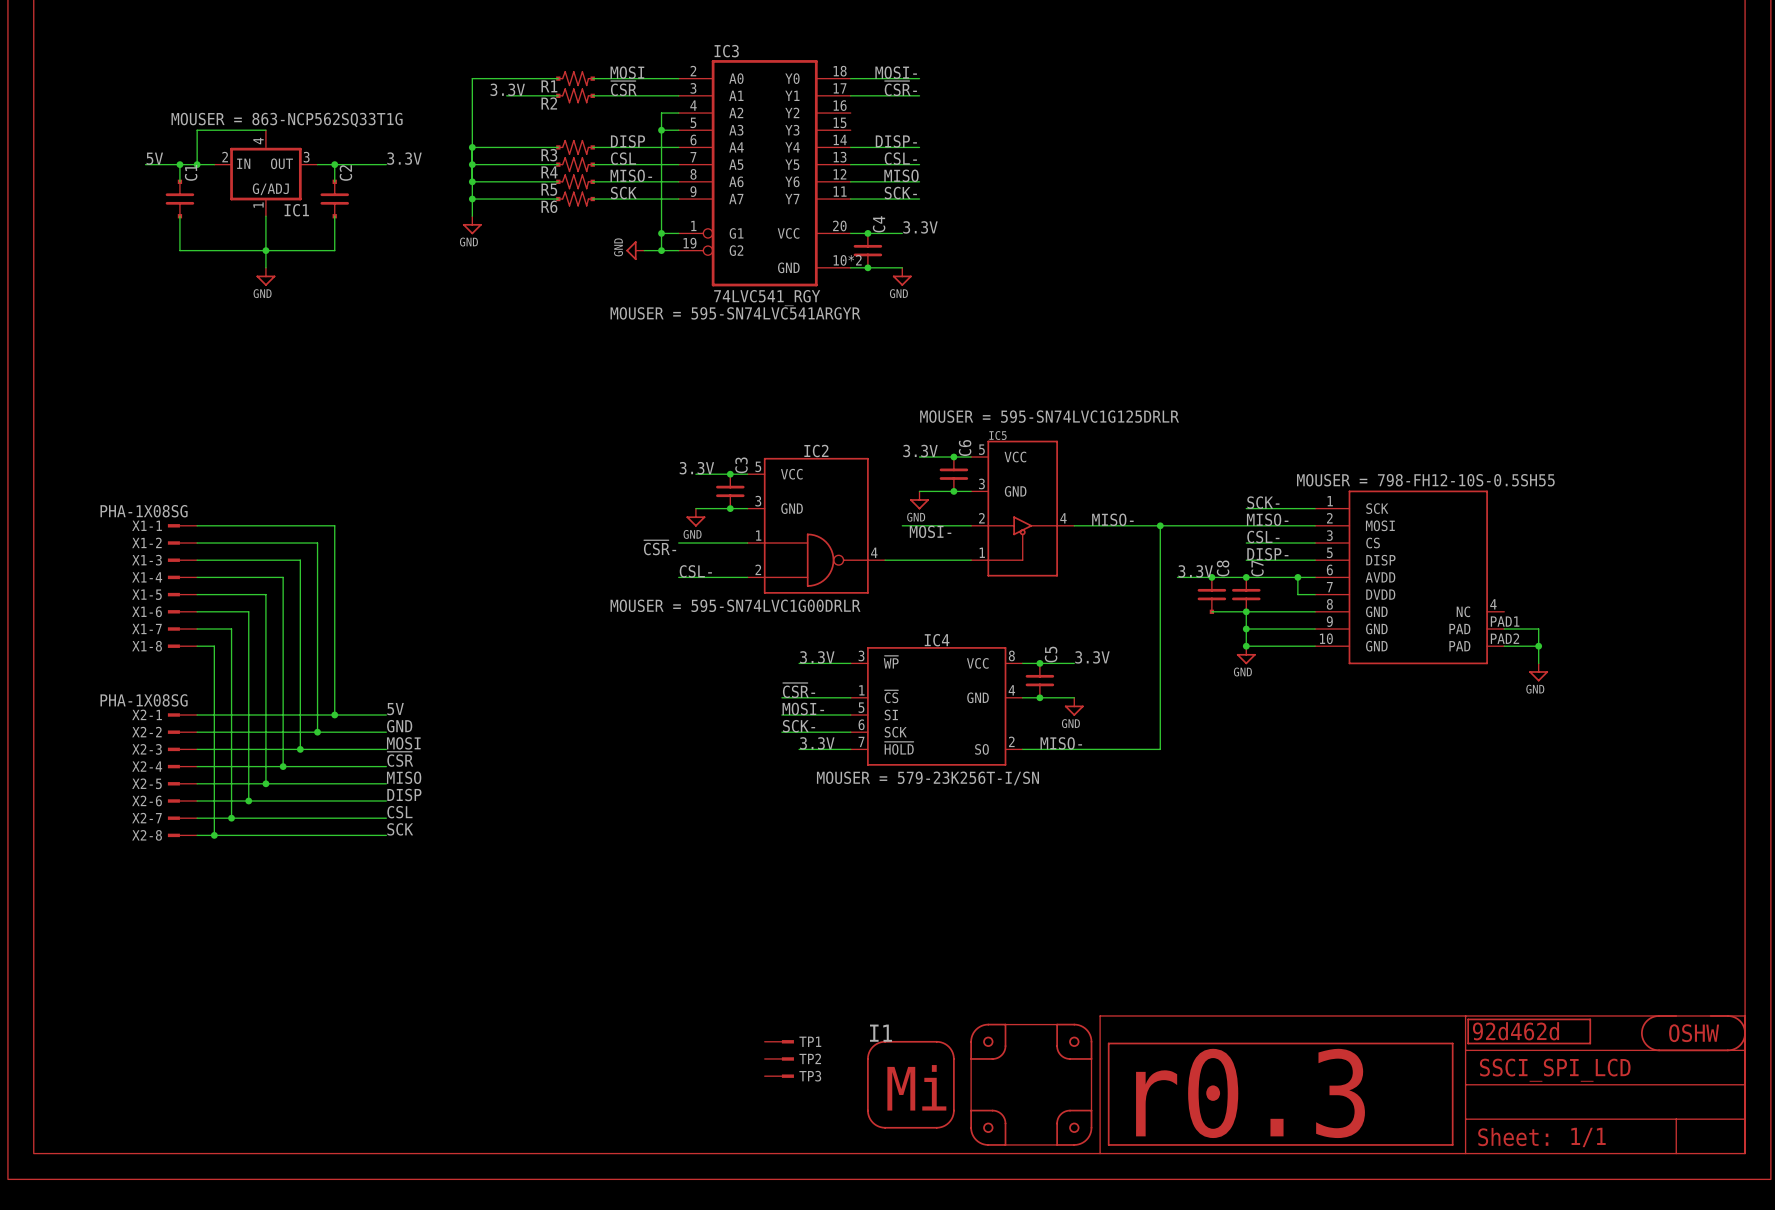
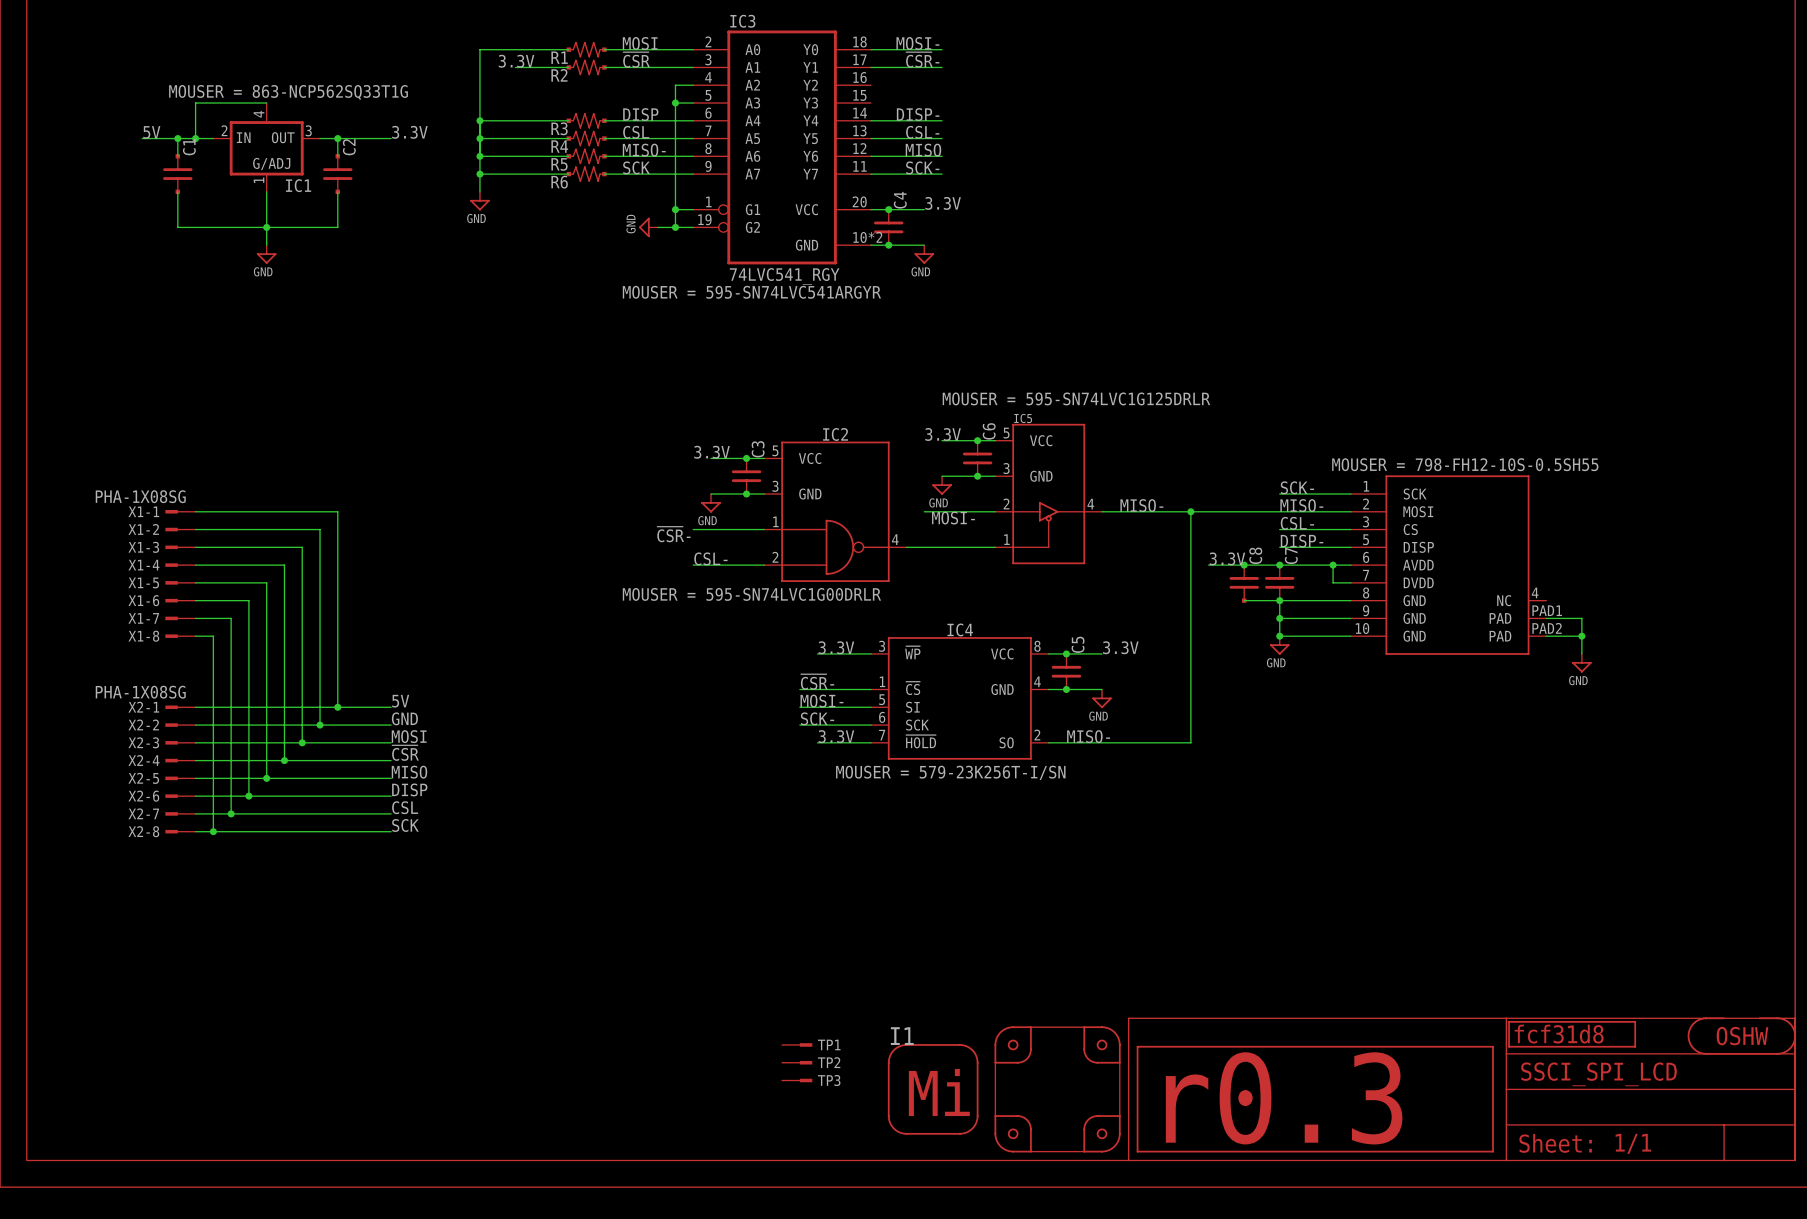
part value: 92d462d (1516, 1031) -> fcf31d8 (1559, 1034)

